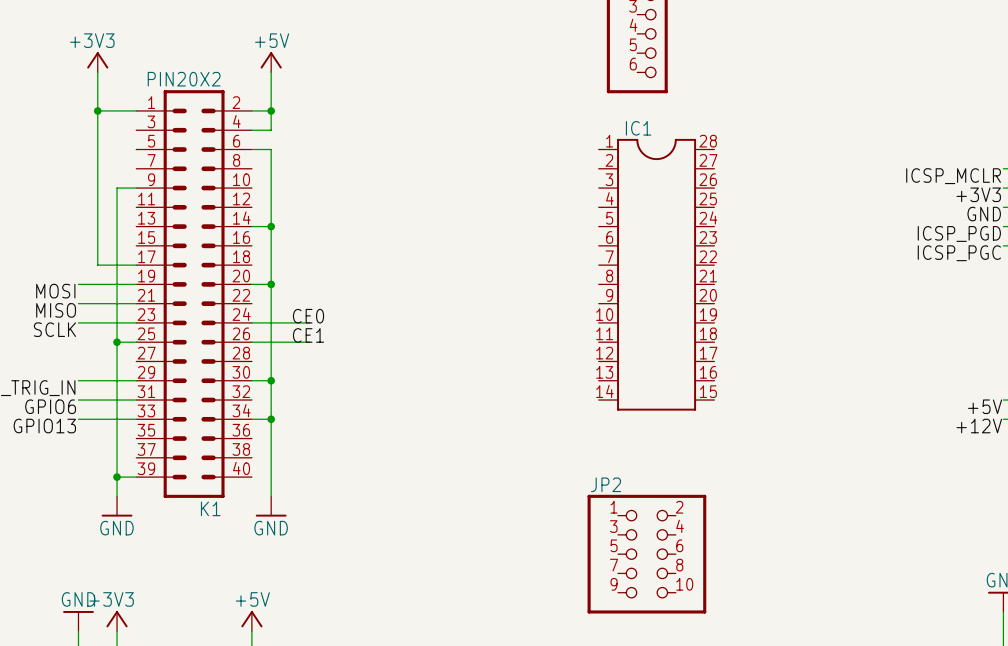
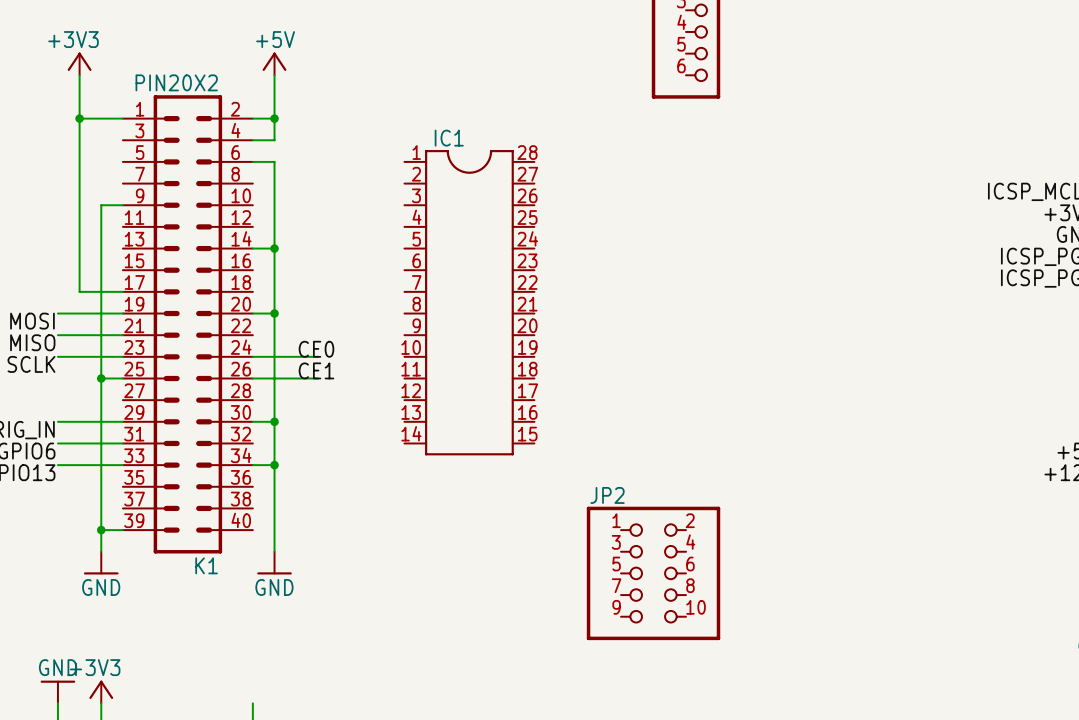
IC1 position: (656, 274) -> (469, 302)
JP2 position: (646, 554) -> (653, 573)
power symbol: +5V (251, 621) -> none

